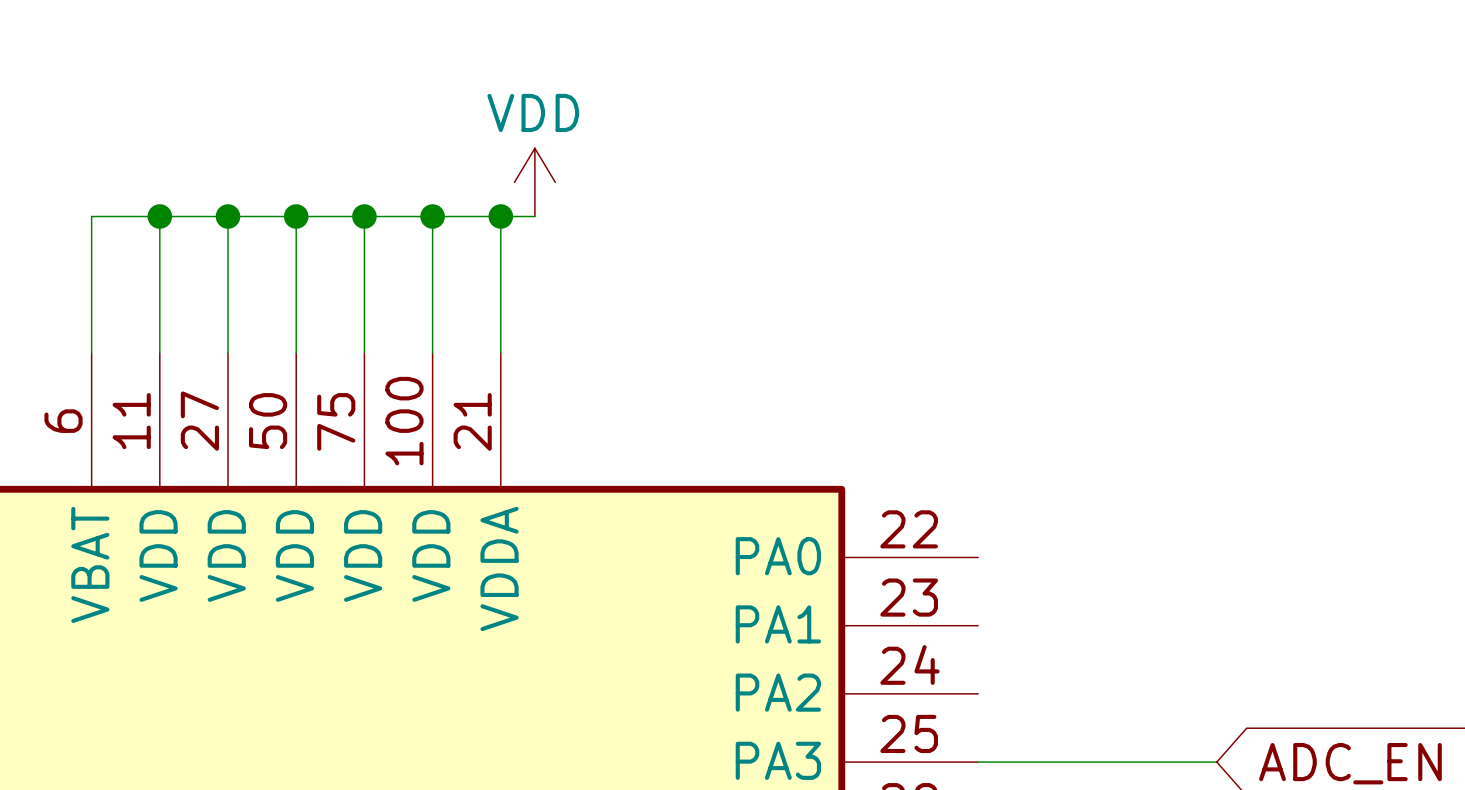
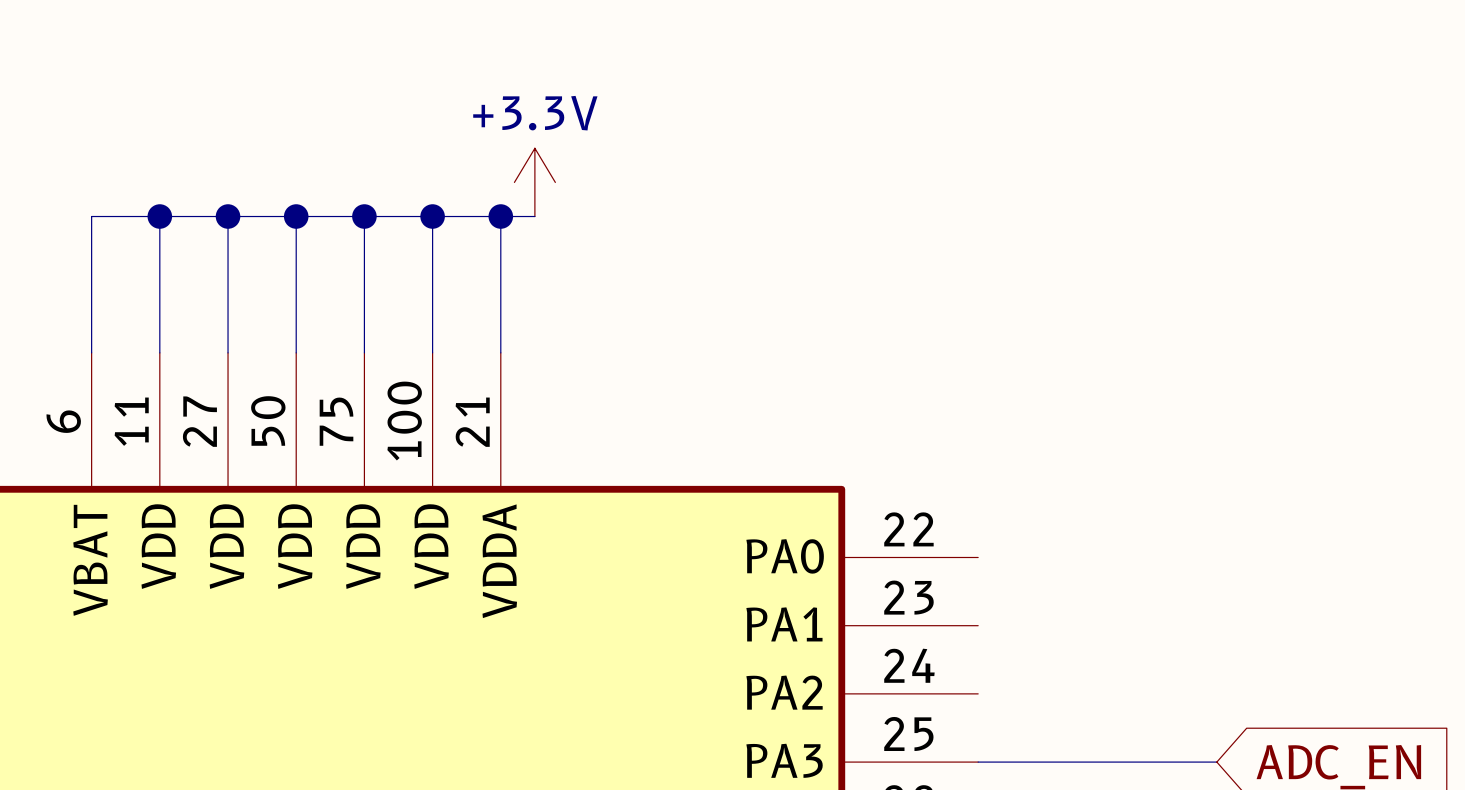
power symbol: VDD (534, 182) -> +3.3V (534, 182)

